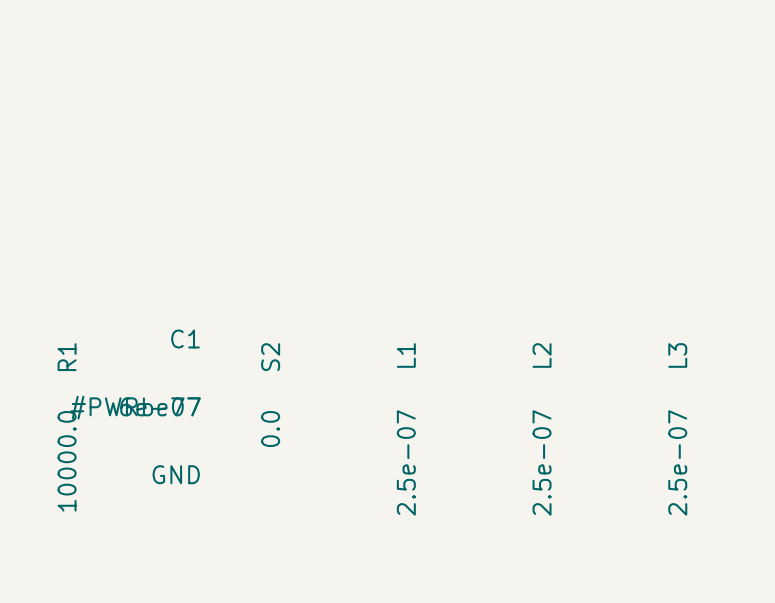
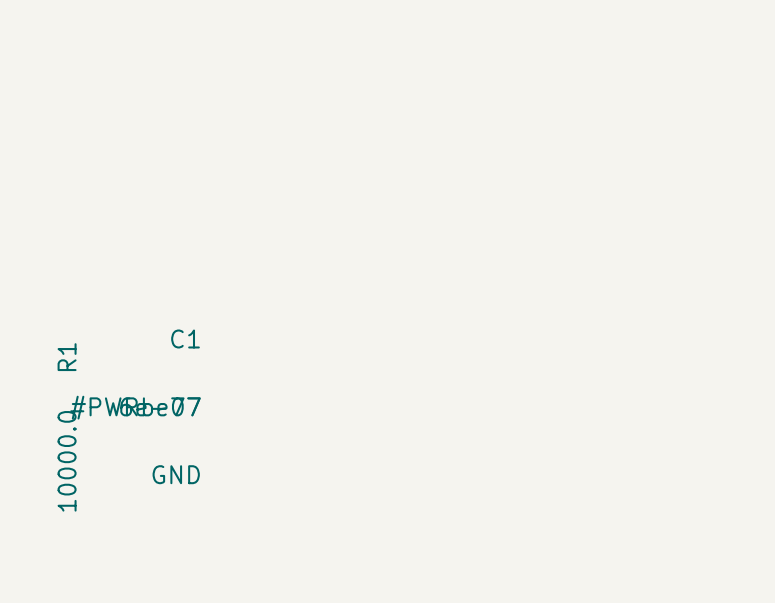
S2: 0.0 (270, 395) -> none
L1: 2.5e-07 (406, 429) -> none
L2: 2.5e-07 (542, 429) -> none
L3: 2.5e-07 (677, 429) -> none

